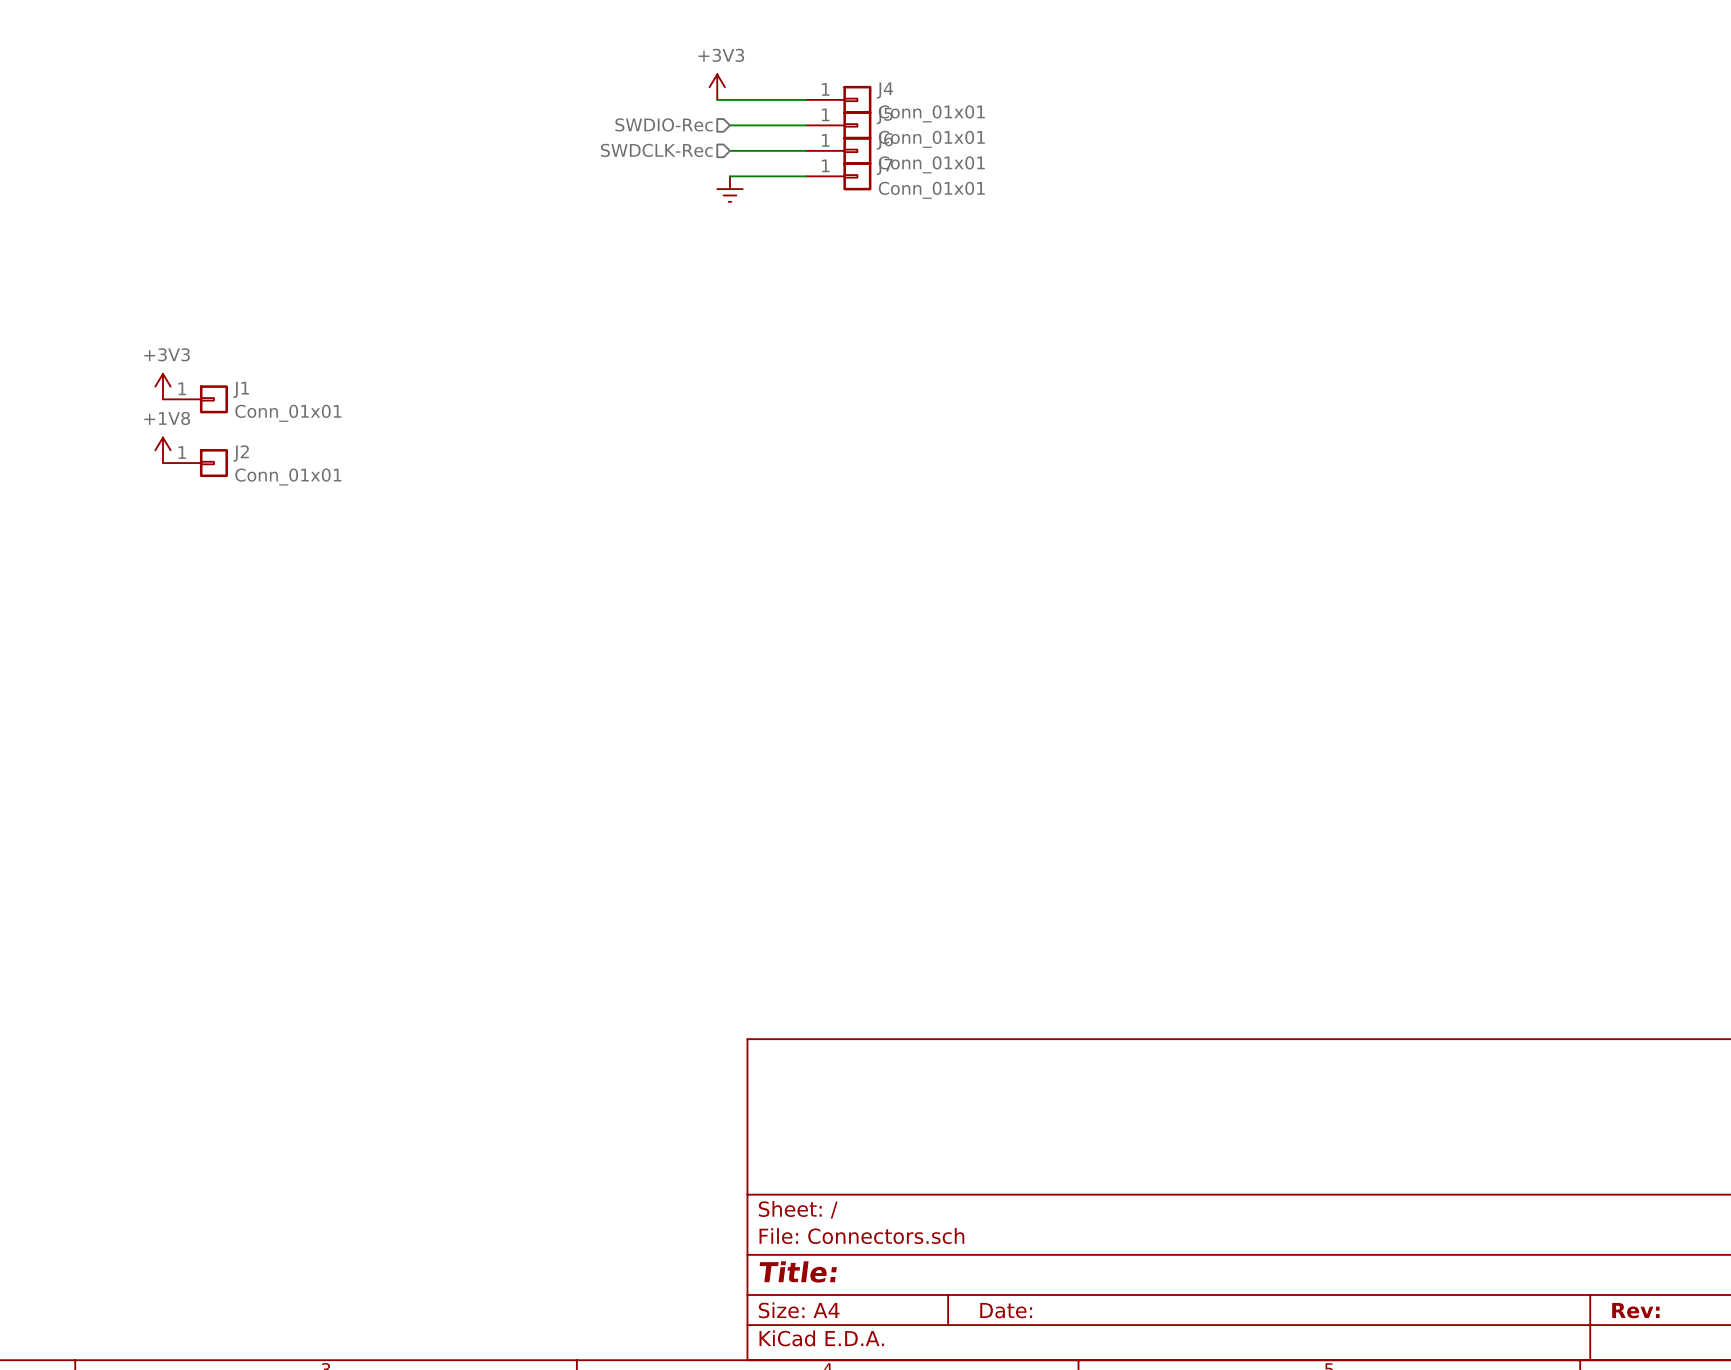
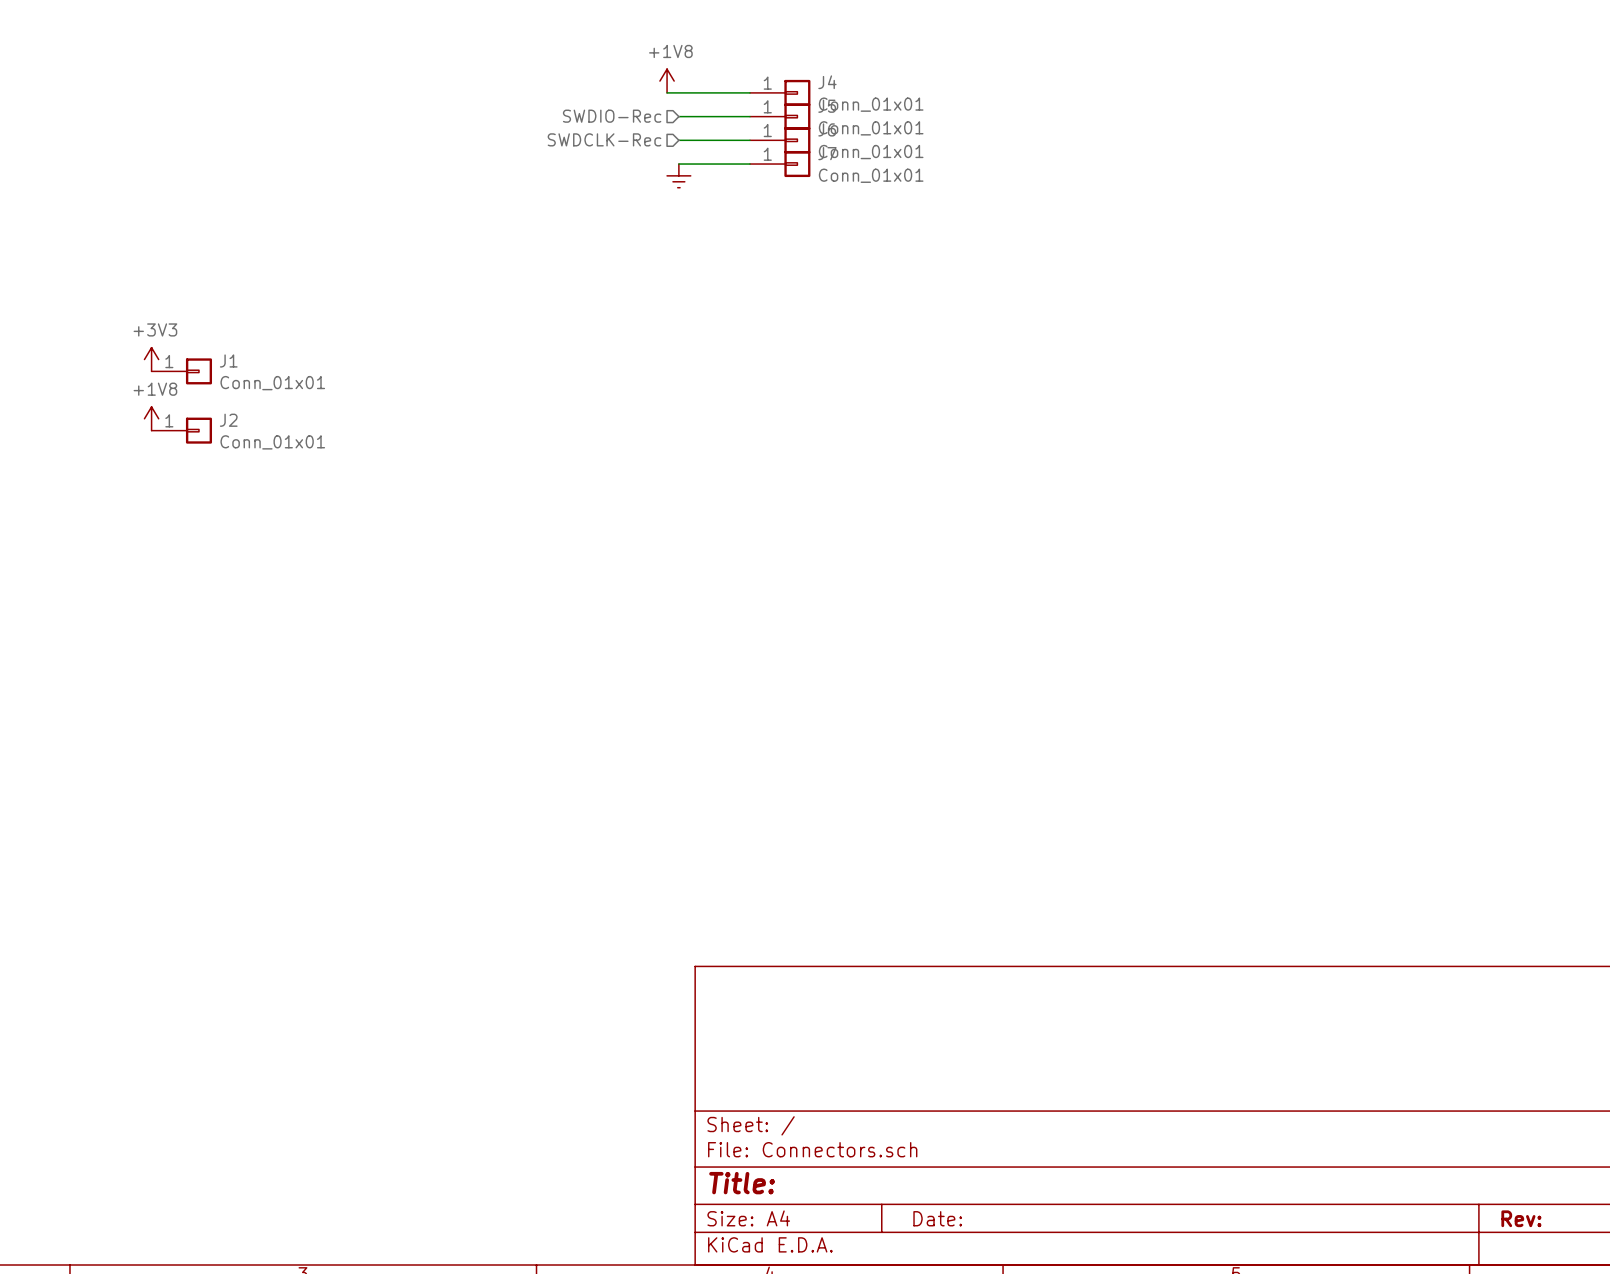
power symbol: +3V3 (717, 87) -> +1V8 (667, 81)

